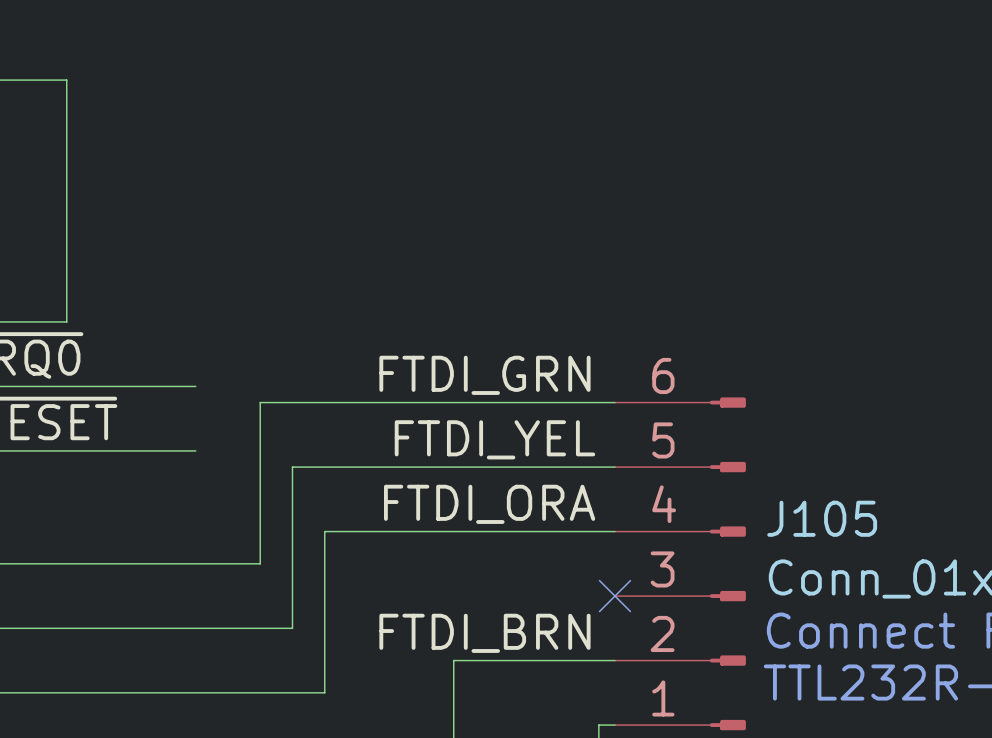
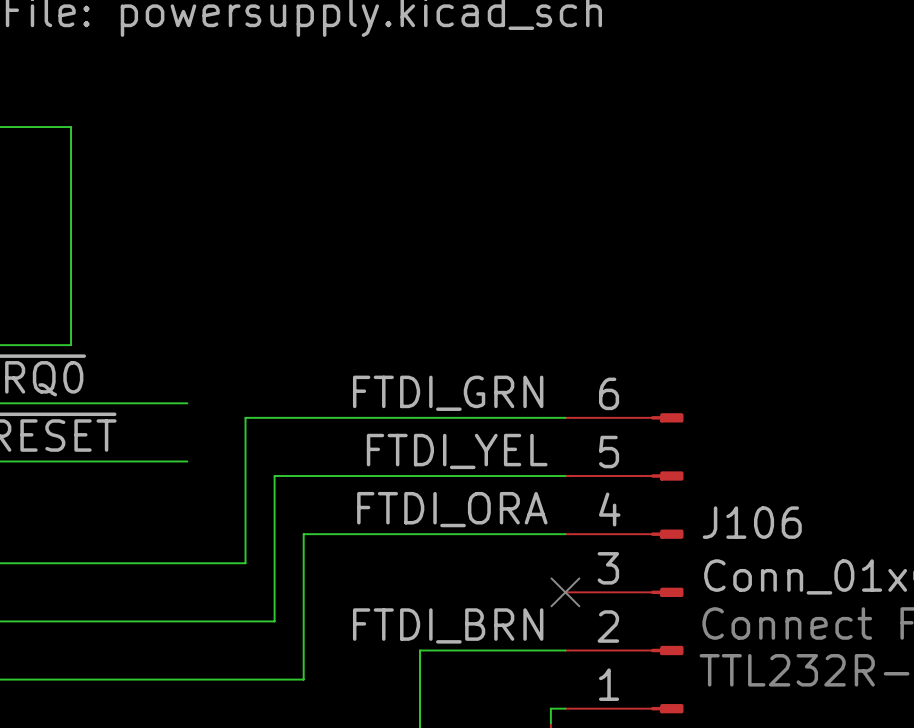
J105 name: J105 (822, 518) -> J106 (752, 522)

